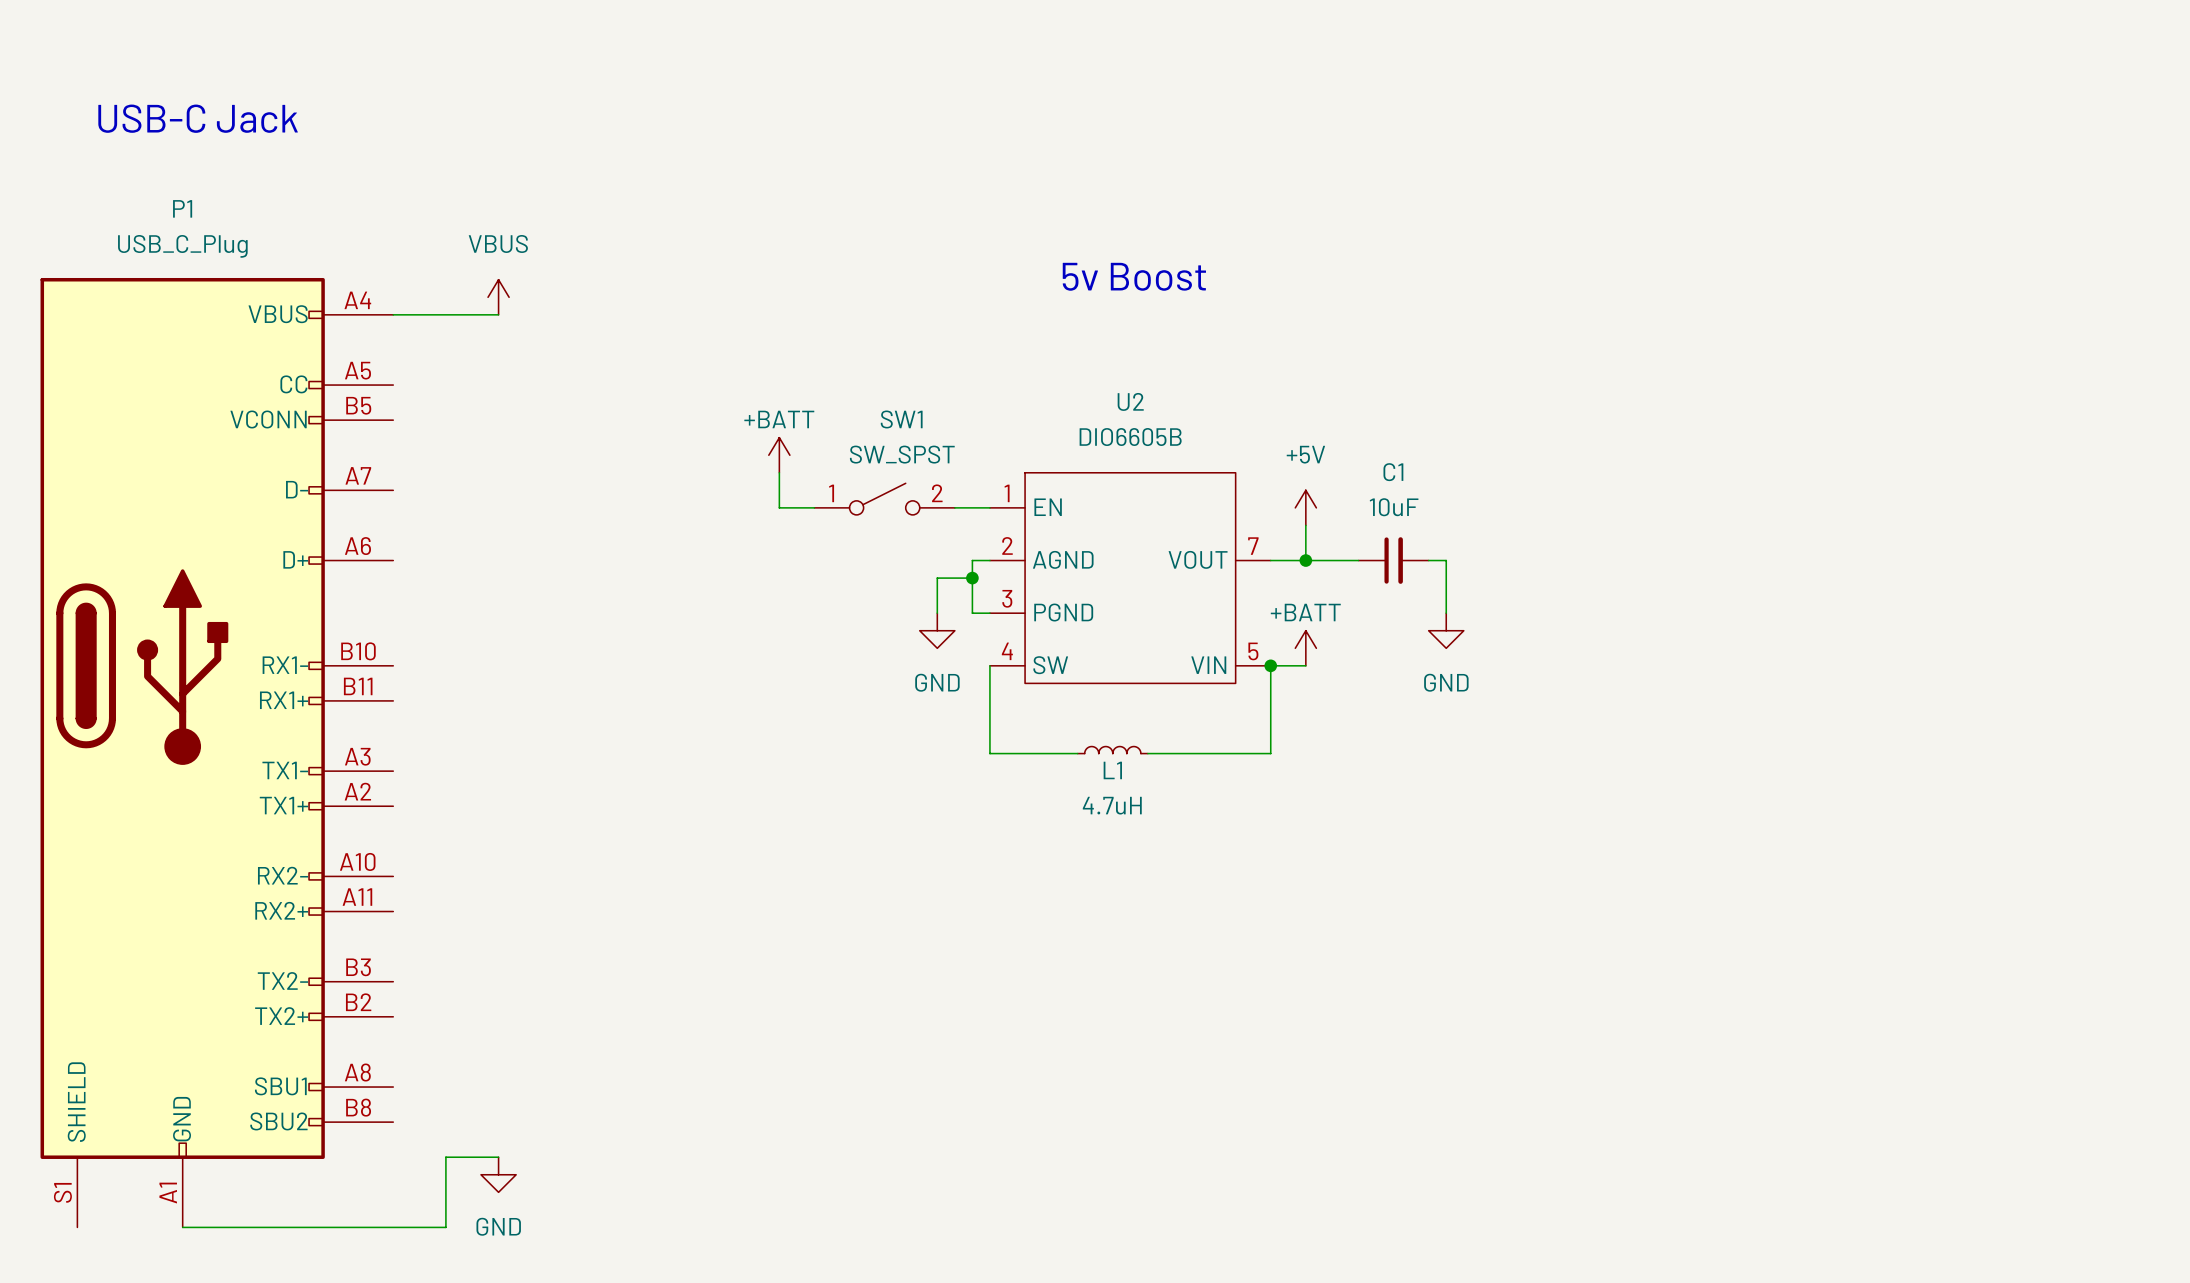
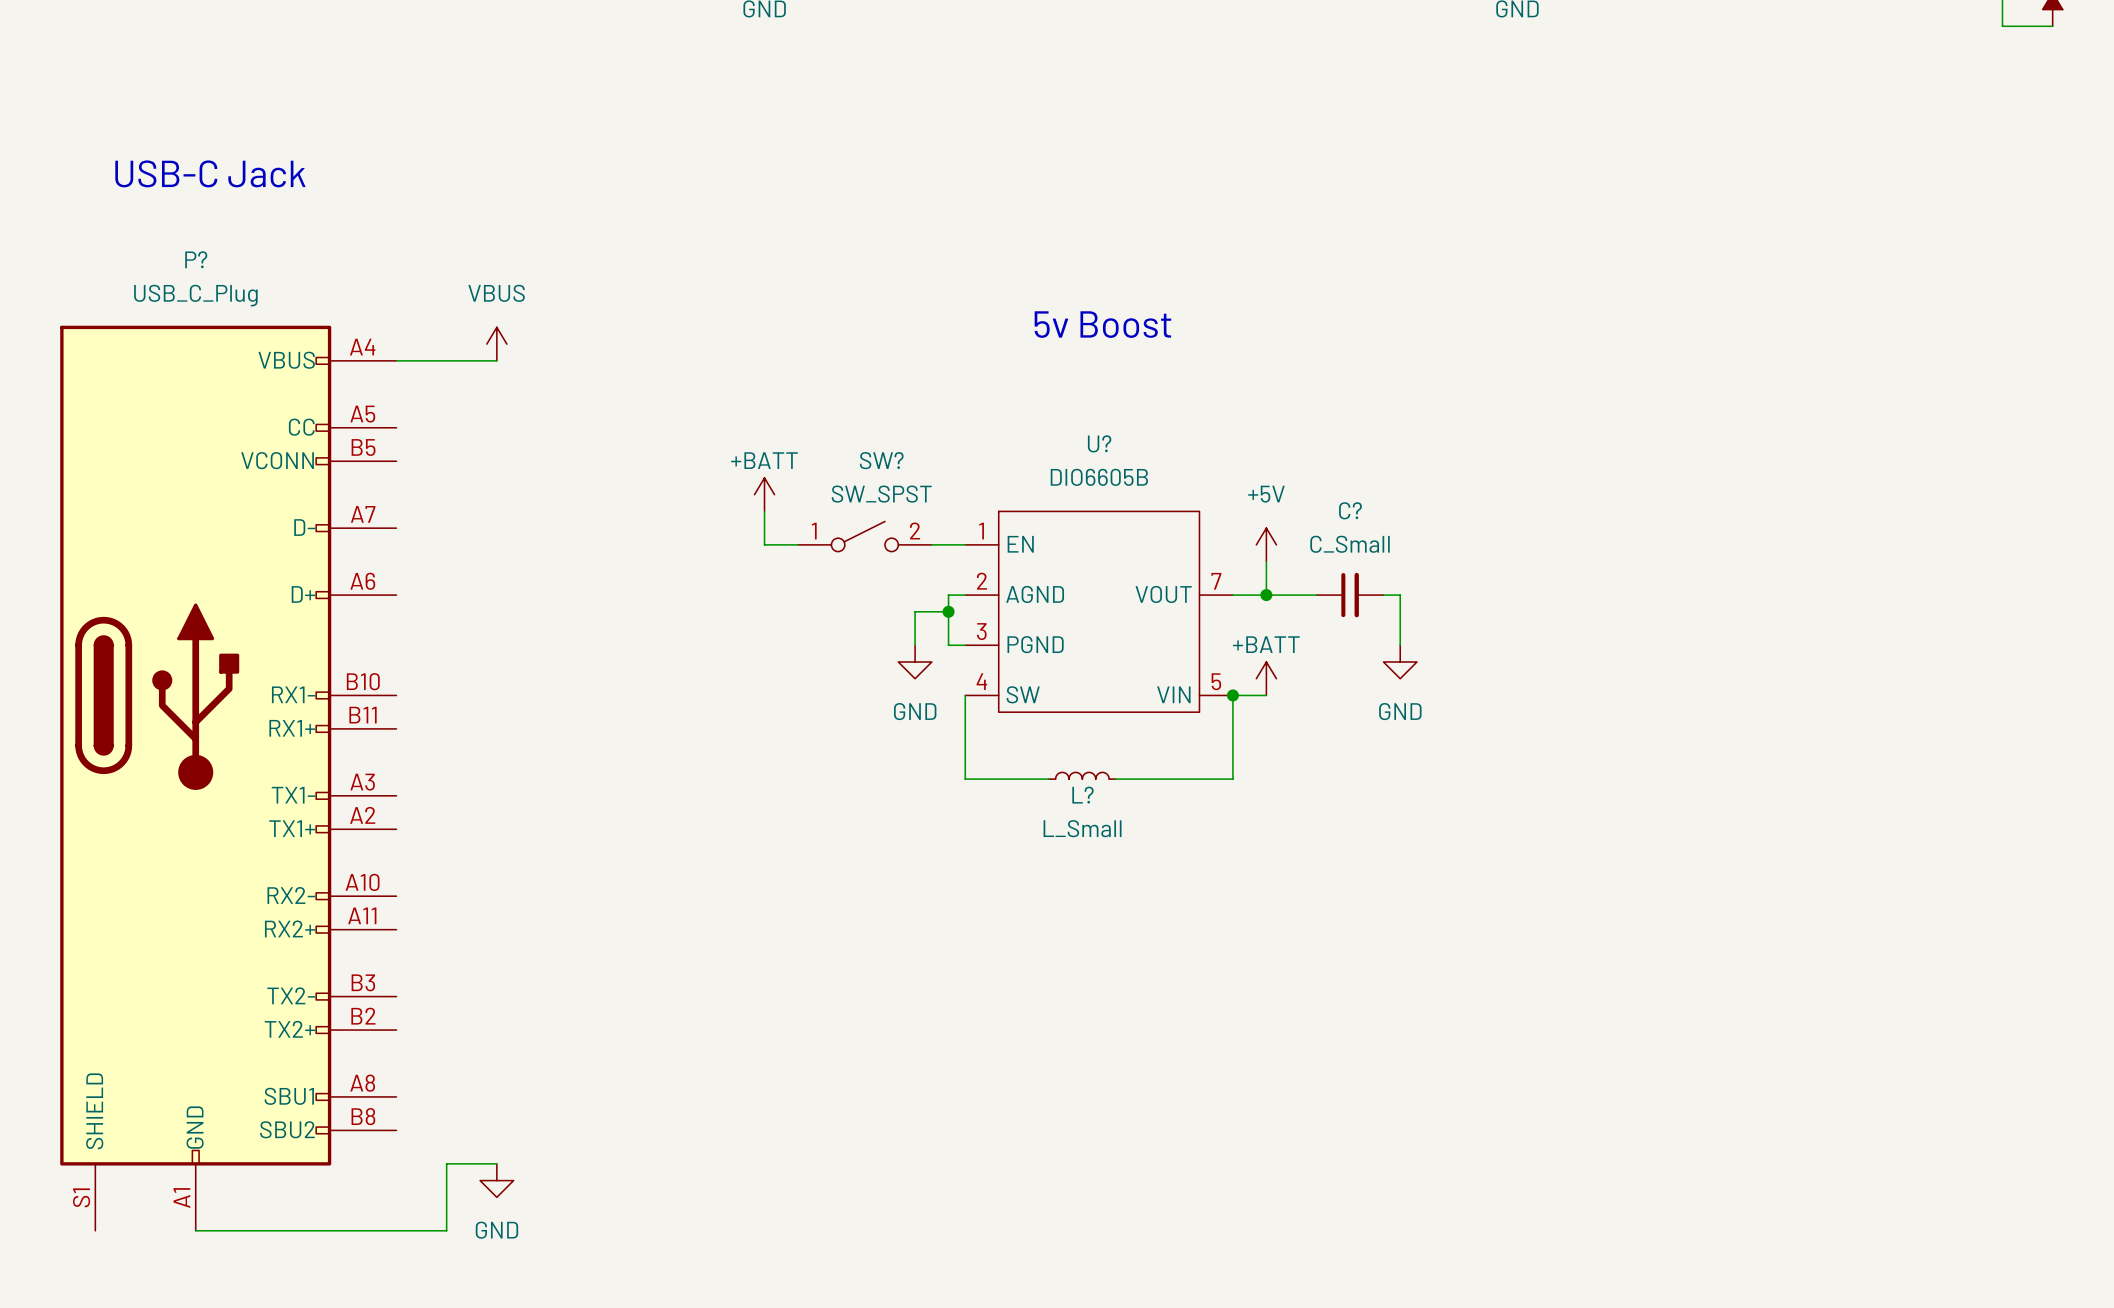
P1 name: P1 (182, 208) -> P? (196, 259)
U2 name: U2 (1130, 401) -> U? (1099, 443)
SW1 name: SW1 (901, 419) -> SW? (881, 460)
C1 name: C1 (1393, 472) -> C? (1350, 510)
C1 value: 10uF (1394, 507) -> C_Small (1350, 544)
L1 name: L1 (1112, 770) -> L? (1082, 795)
L1 value: 4.7uH (1112, 805) -> L_Small (1082, 828)

